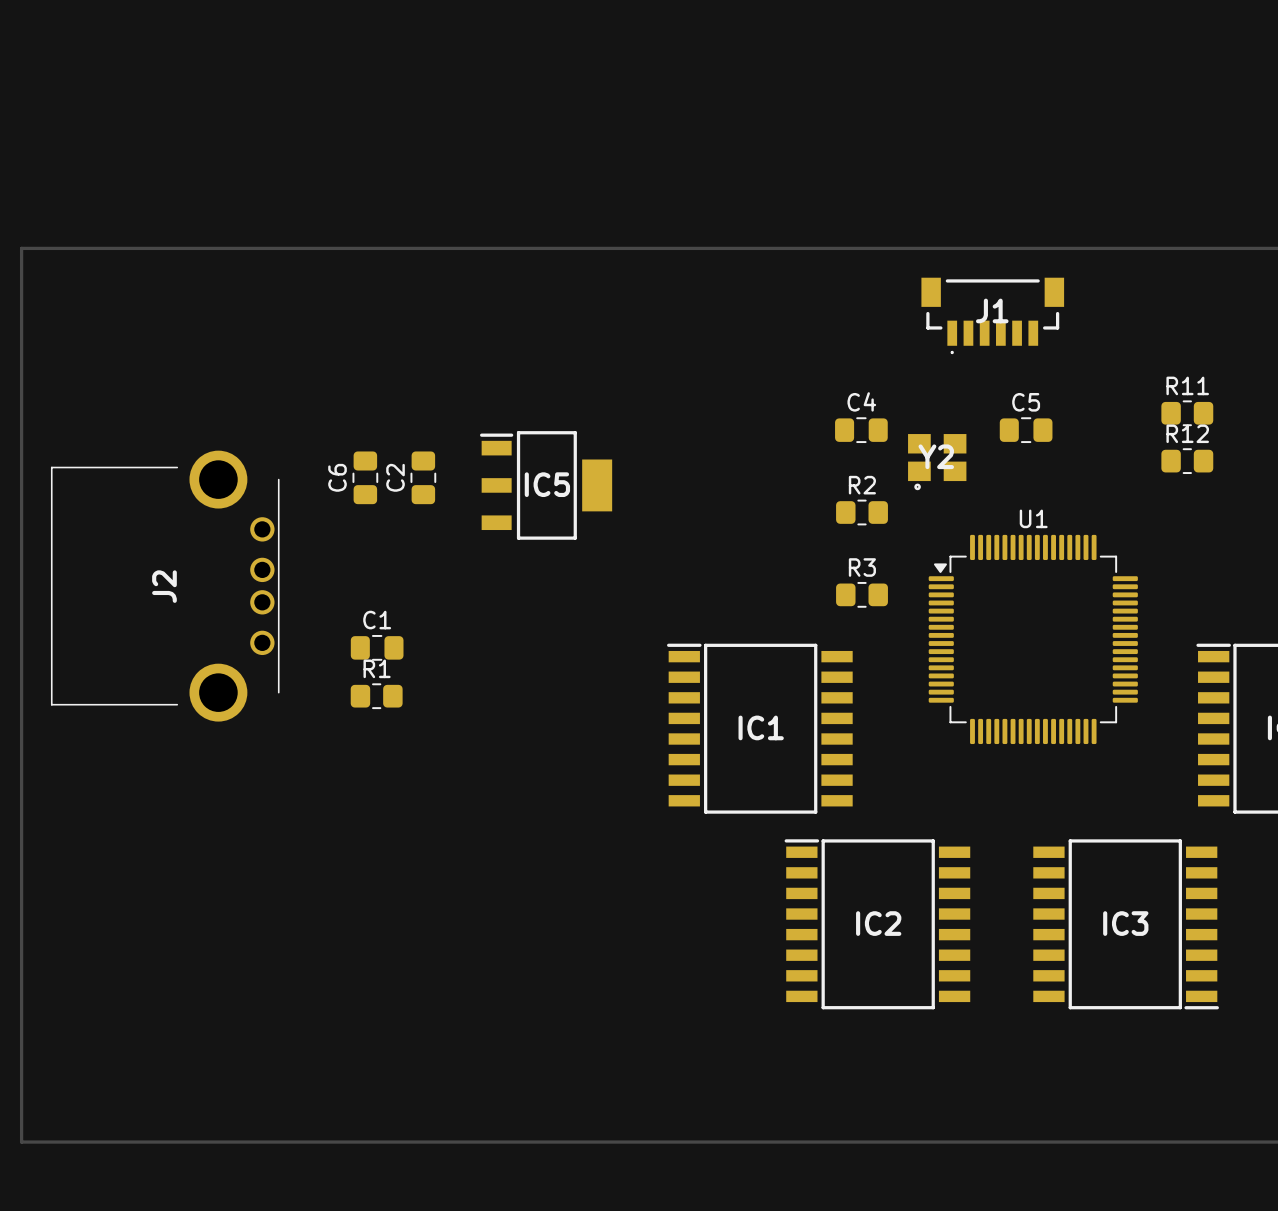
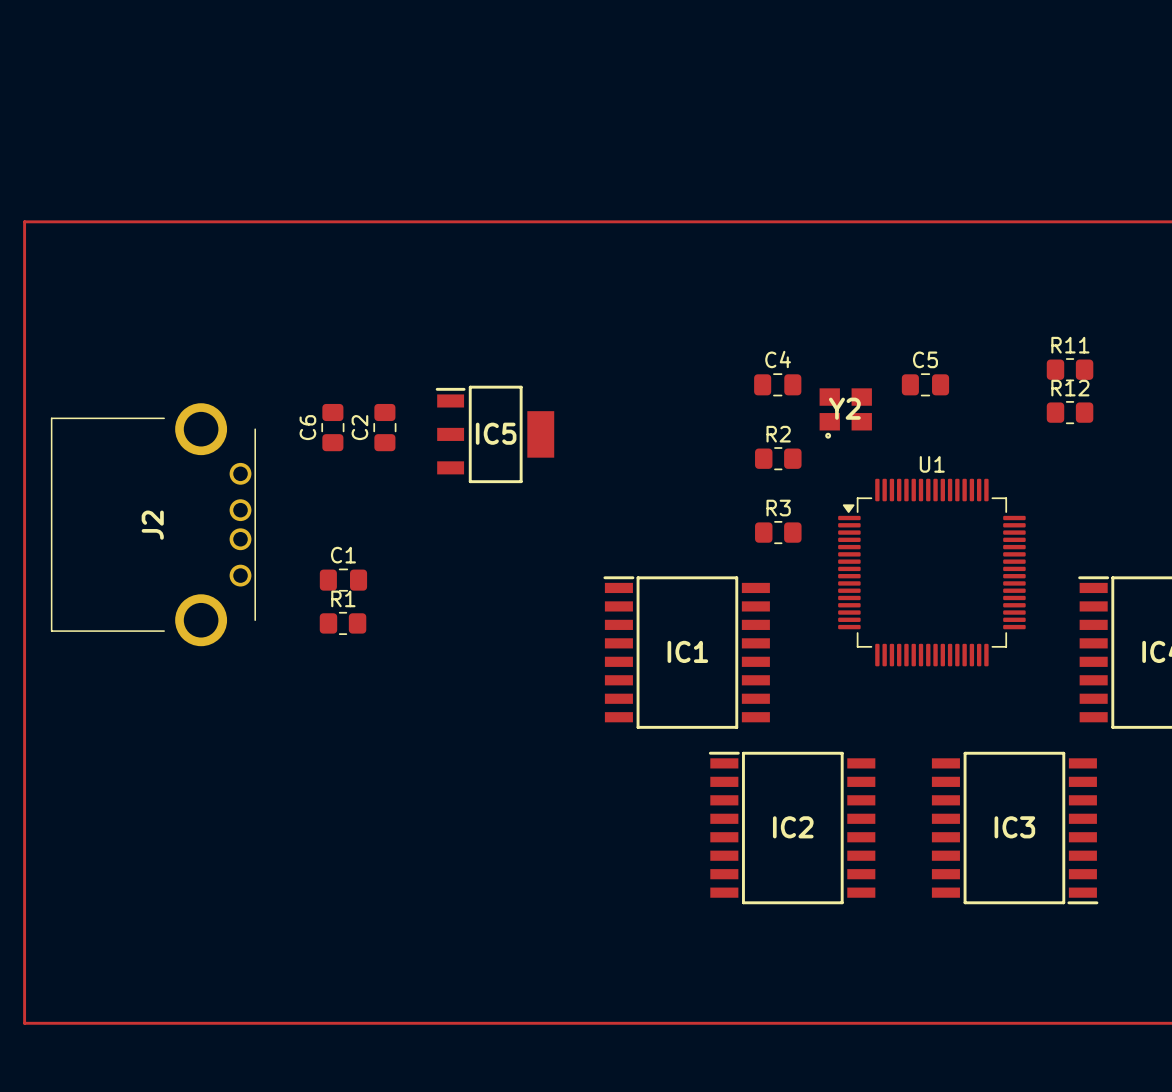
J1: (992, 315) -> none

